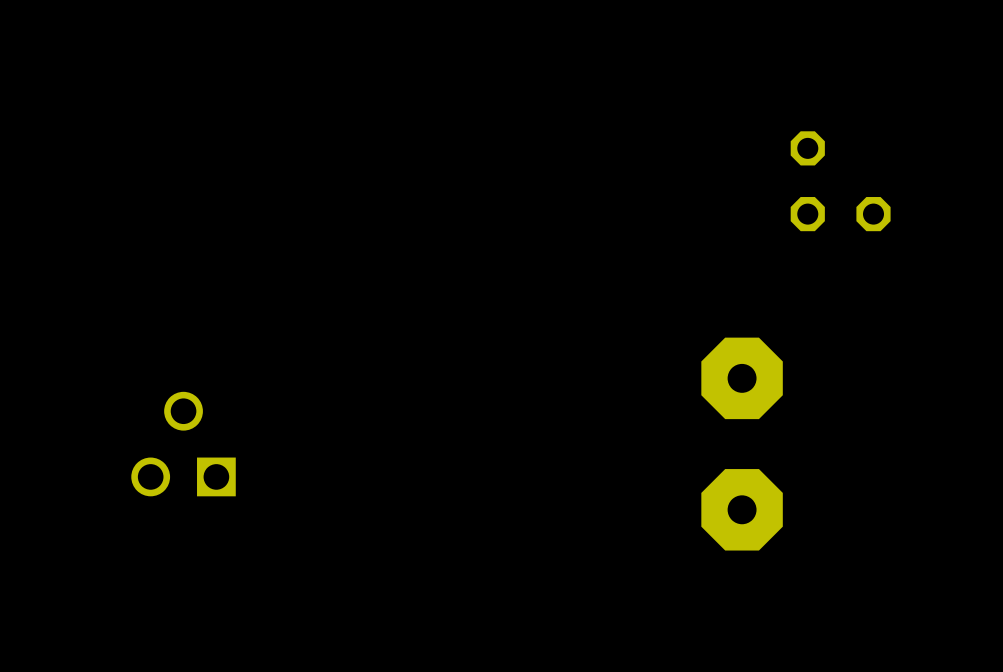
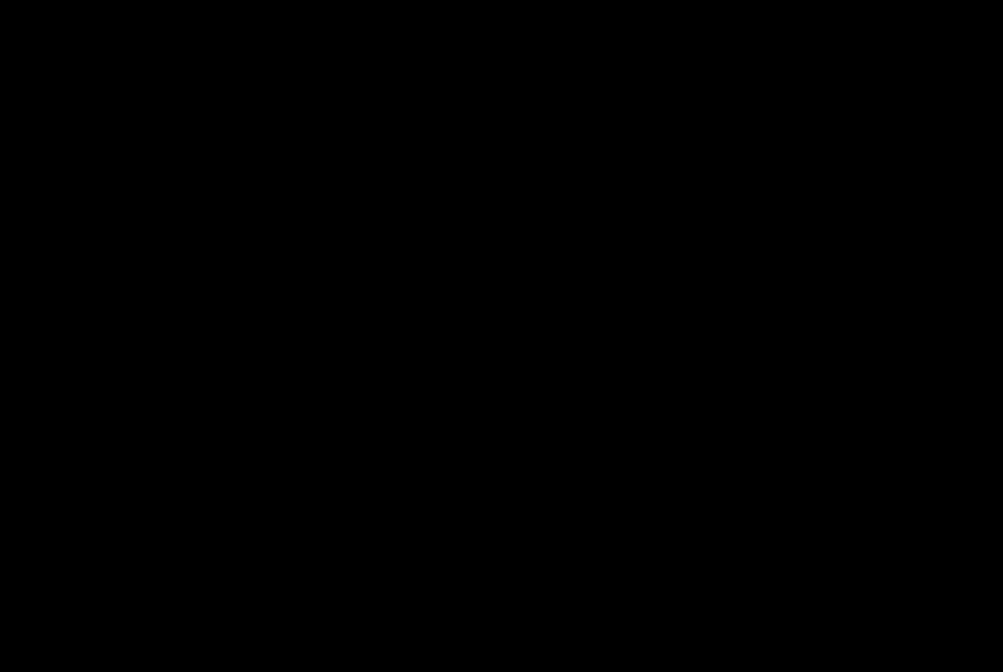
part: (840, 181) -> none
part: (183, 444) -> none
part: (742, 444) -> none

